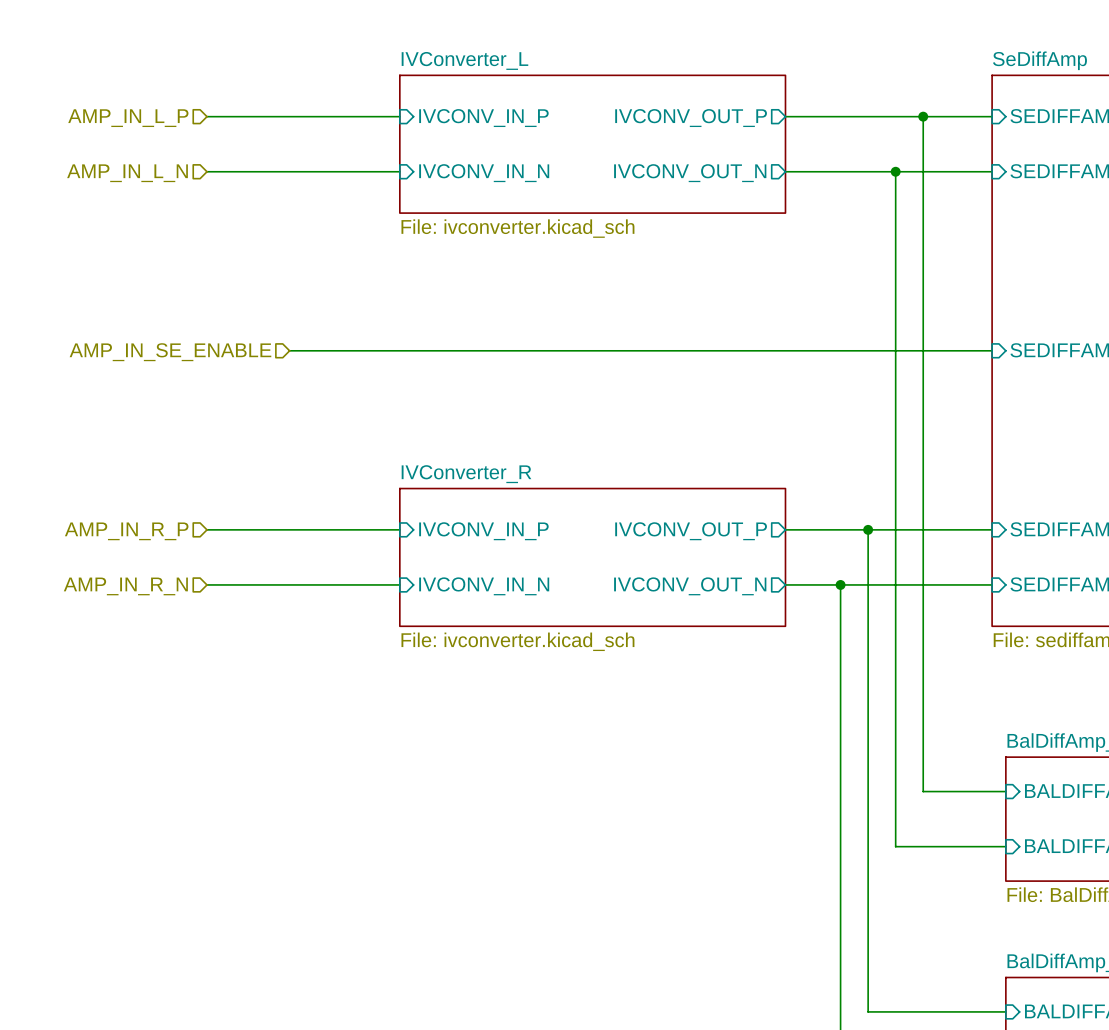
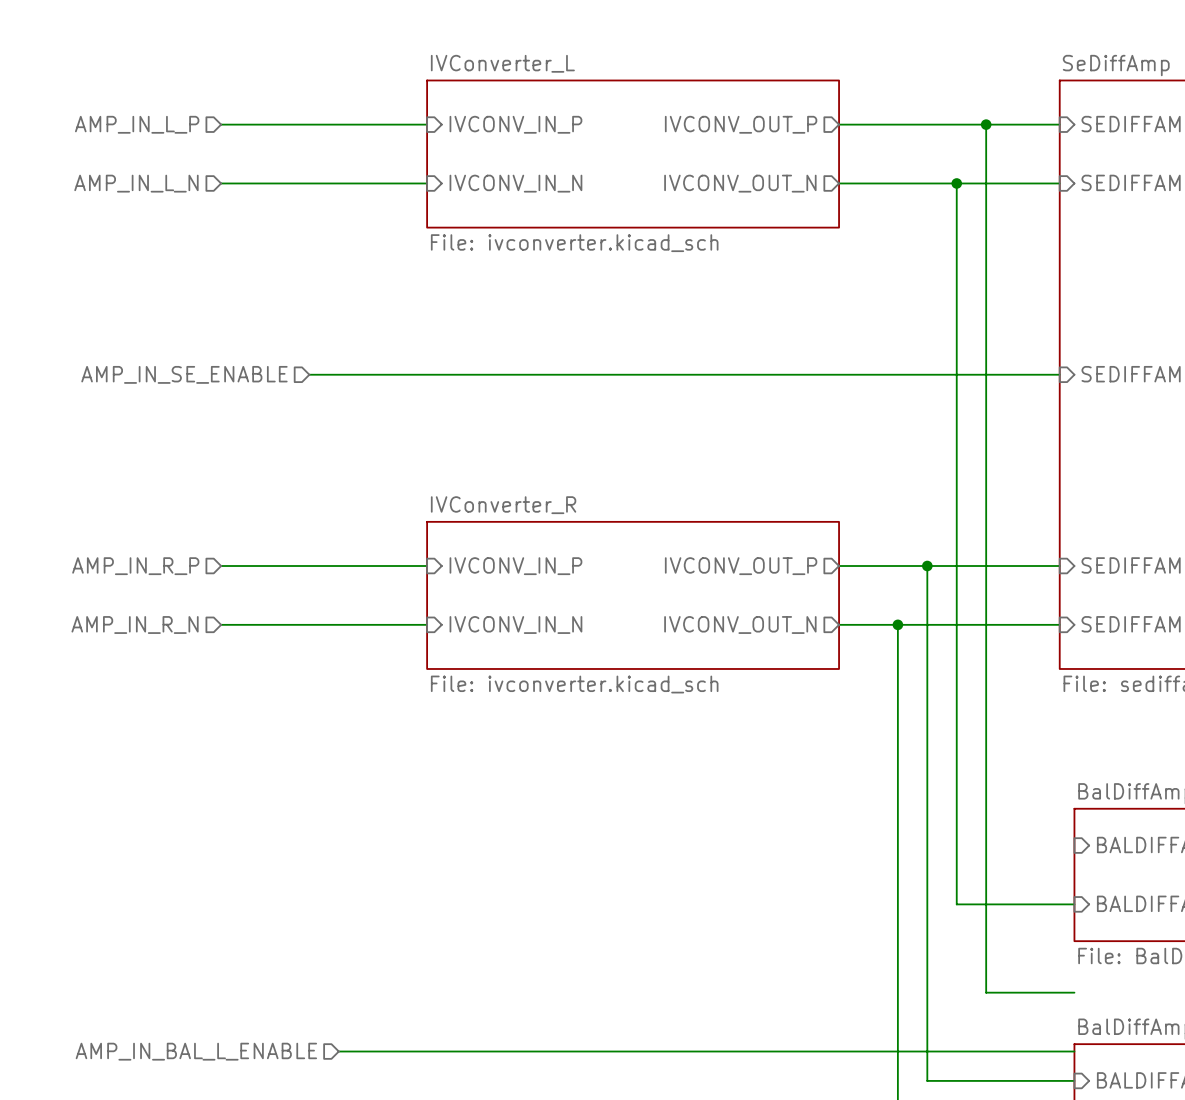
wire: (923, 791) (1005, 791) -> (986, 845) (986, 992) (1074, 992)
wire: none -> (338, 1051) (1074, 1051)
hierarchical label: none -> AMP_IN_BAL_L_ENABLE (196, 1051)

